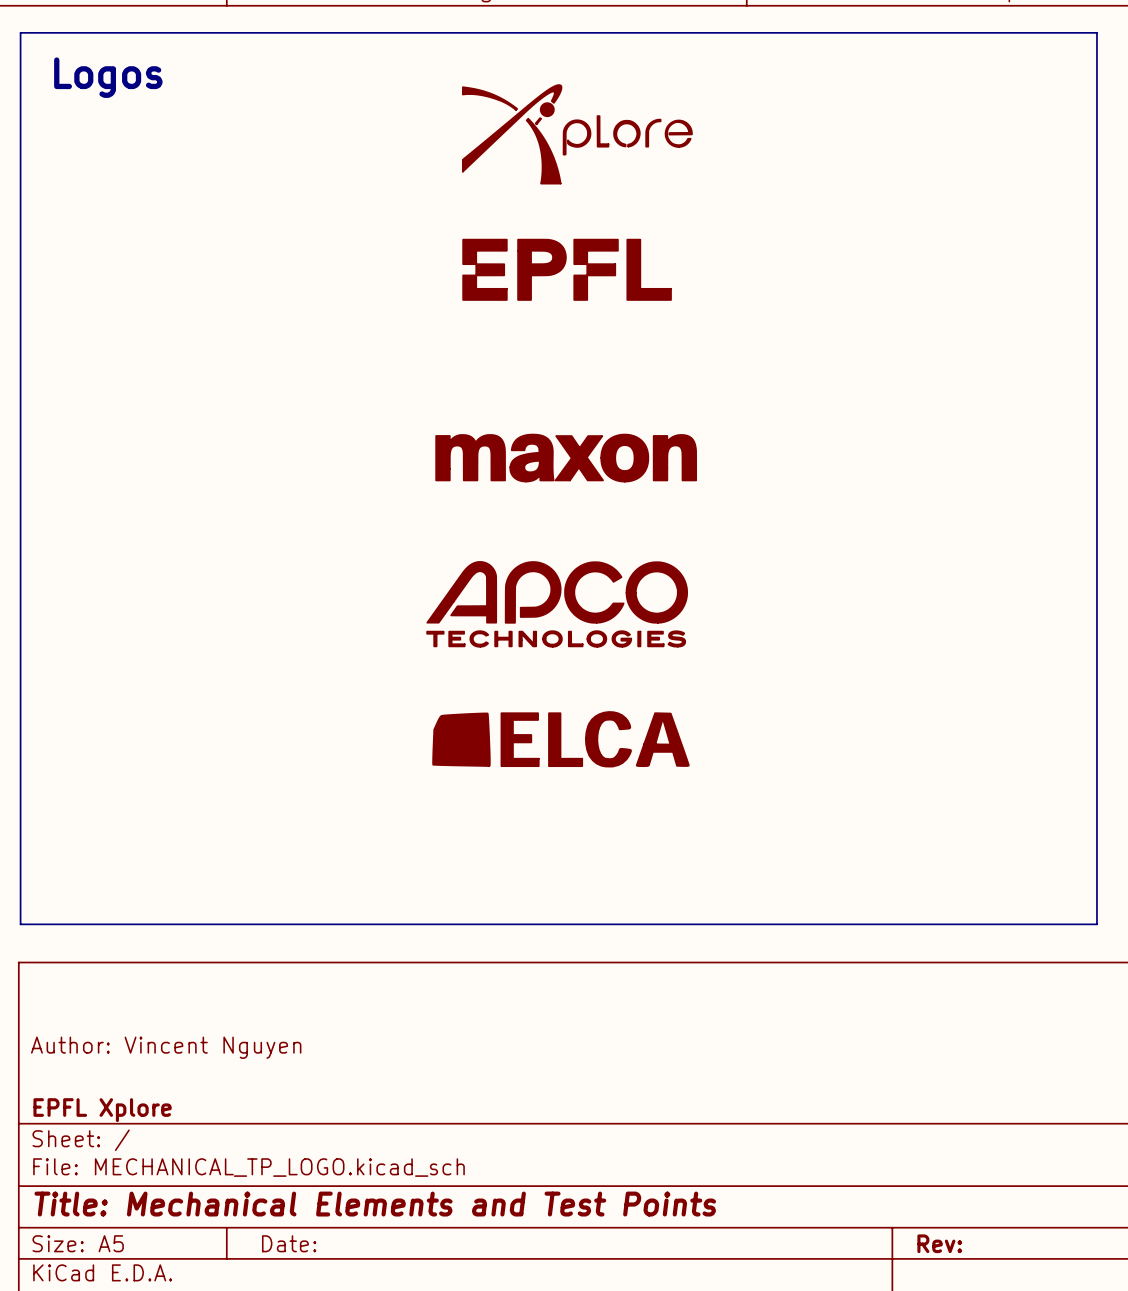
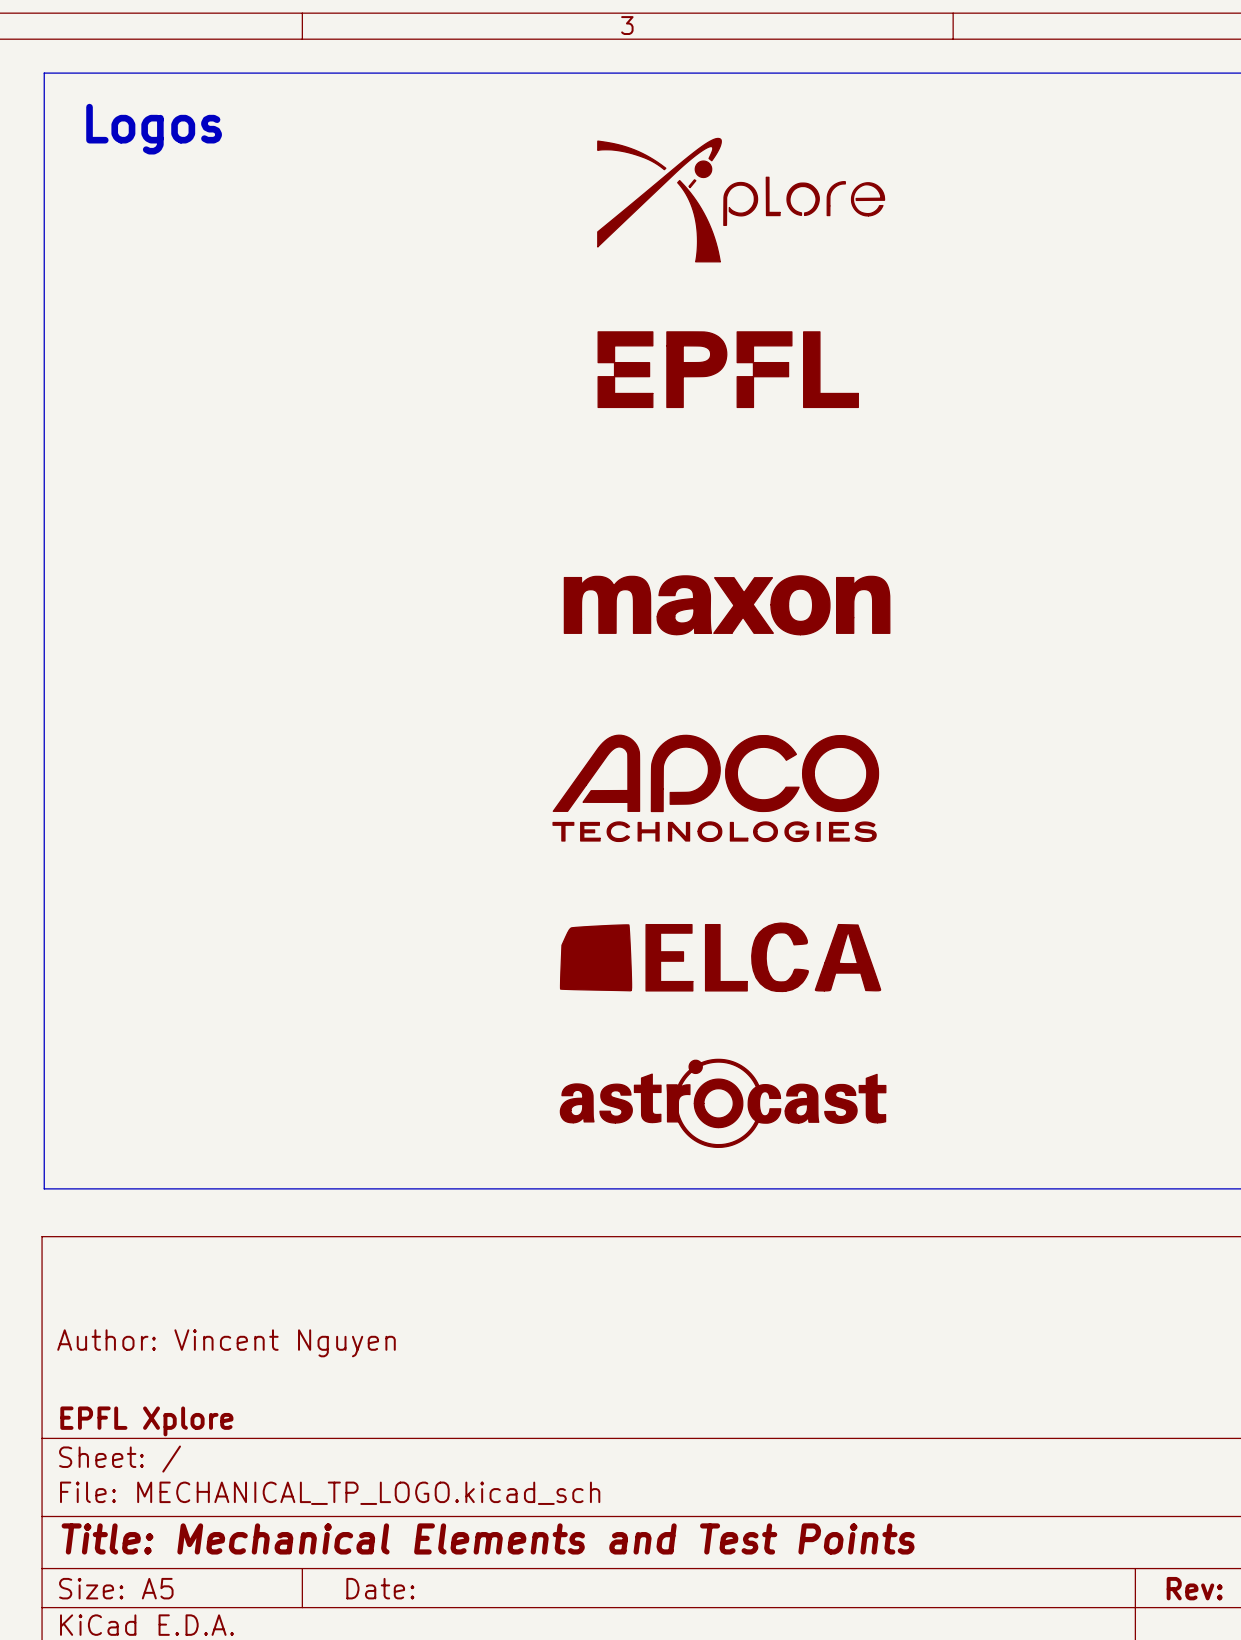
part: none -> (723, 1103)

